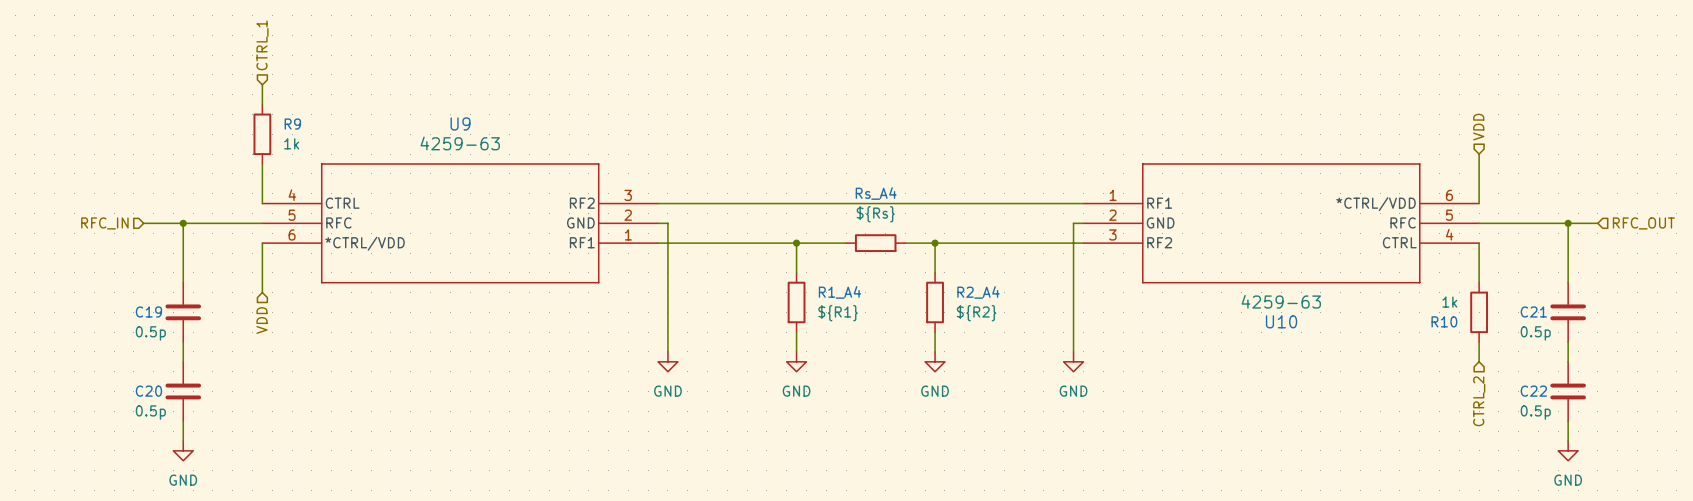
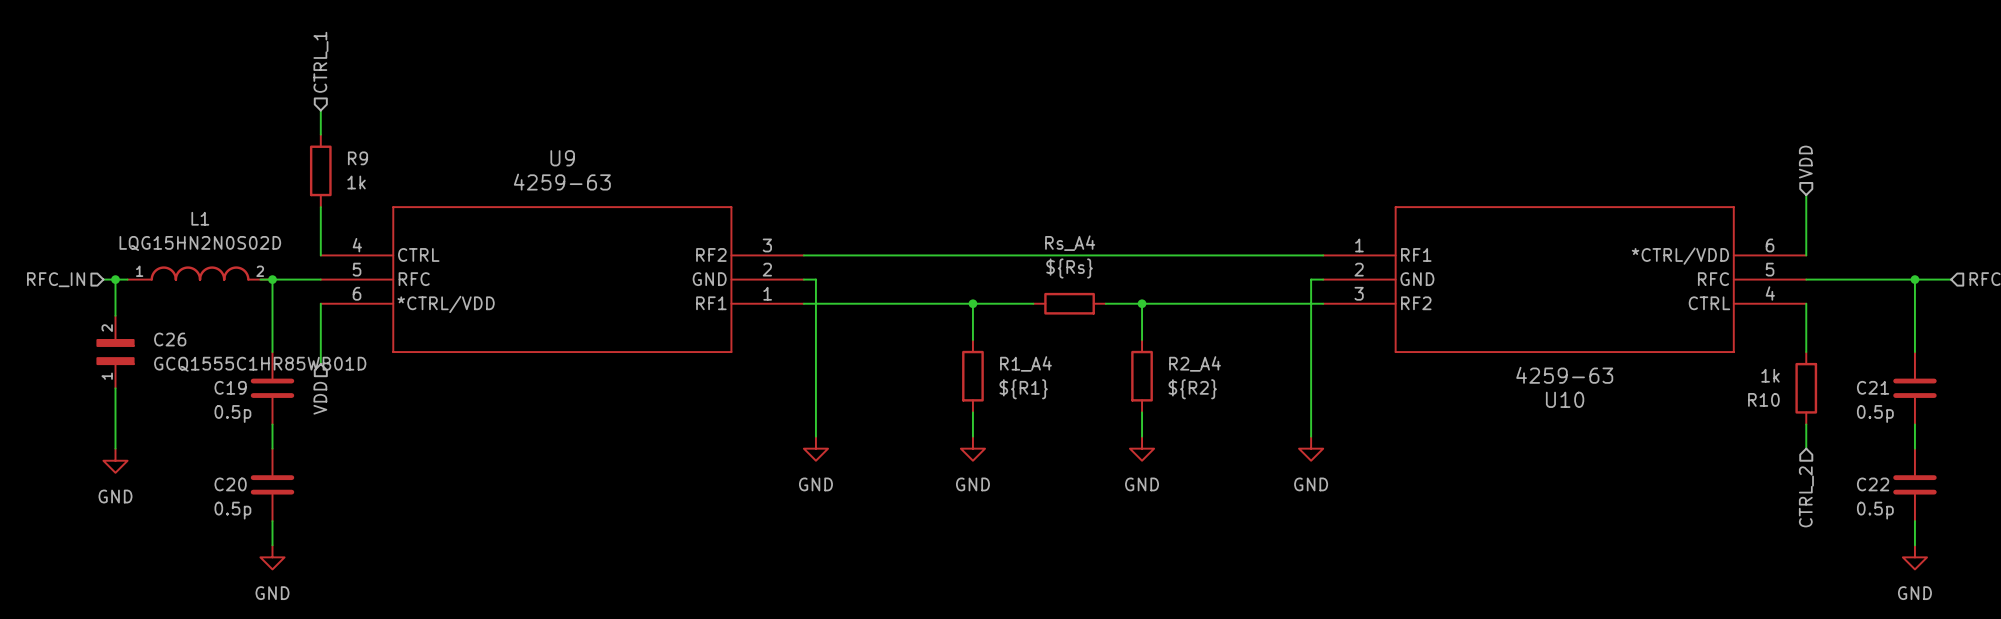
L1: none -> LQG15HN2N0S02D (200, 273)
wire: none -> (103, 279) (127, 279)
wire: none -> (115, 279) (115, 315)
junction: none -> (115, 279)
hierarchical label position: RFC_IN (104, 223) -> RFC_IN (56, 279)
wire: (143, 223) (212, 223) -> none
wire: (183, 223) (183, 282) -> (272, 279) (272, 352)
junction position: (183, 223) -> (272, 279)
C26: none -> GCQ1555C1HR85WB01D (115, 352)
wire: none -> (115, 388) (115, 448)
C19 position: (183, 312) -> (272, 388)
wire: (183, 342) (183, 361) -> (272, 424) (272, 448)
power symbol: none -> GND (115, 460)
C20 position: (183, 391) -> (272, 484)
wire: (183, 421) (183, 440) -> (272, 521) (272, 545)
power symbol position: GND (183, 450) -> GND (272, 557)

